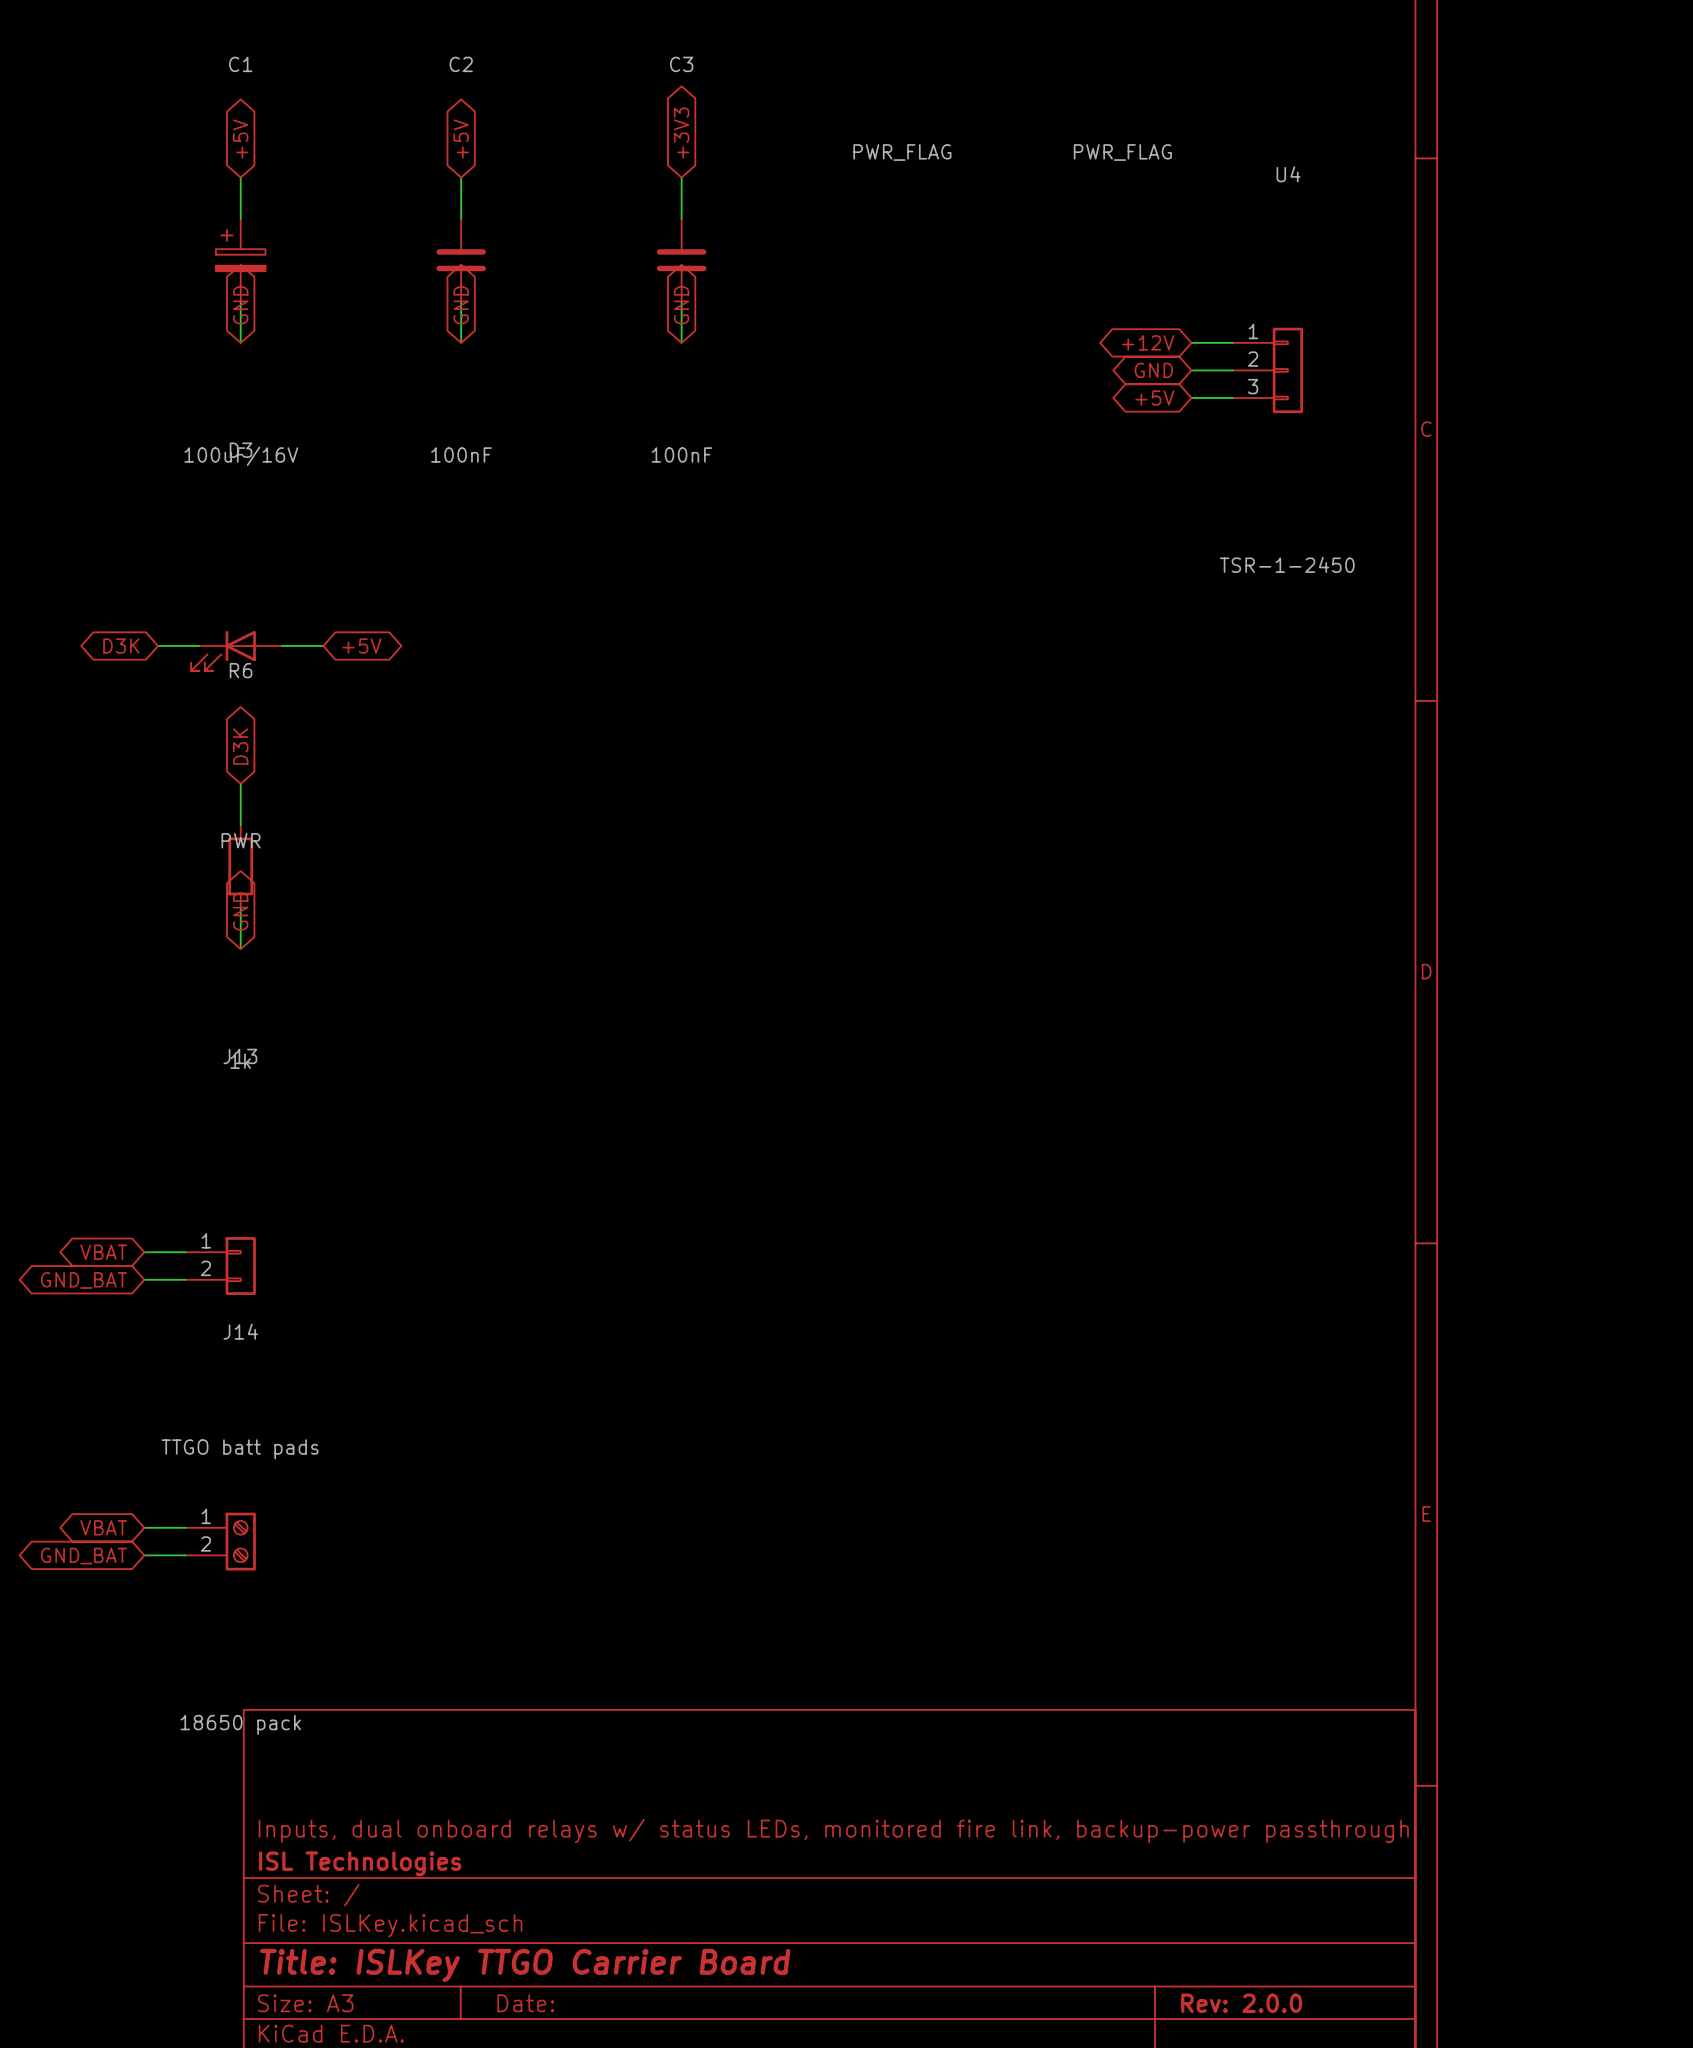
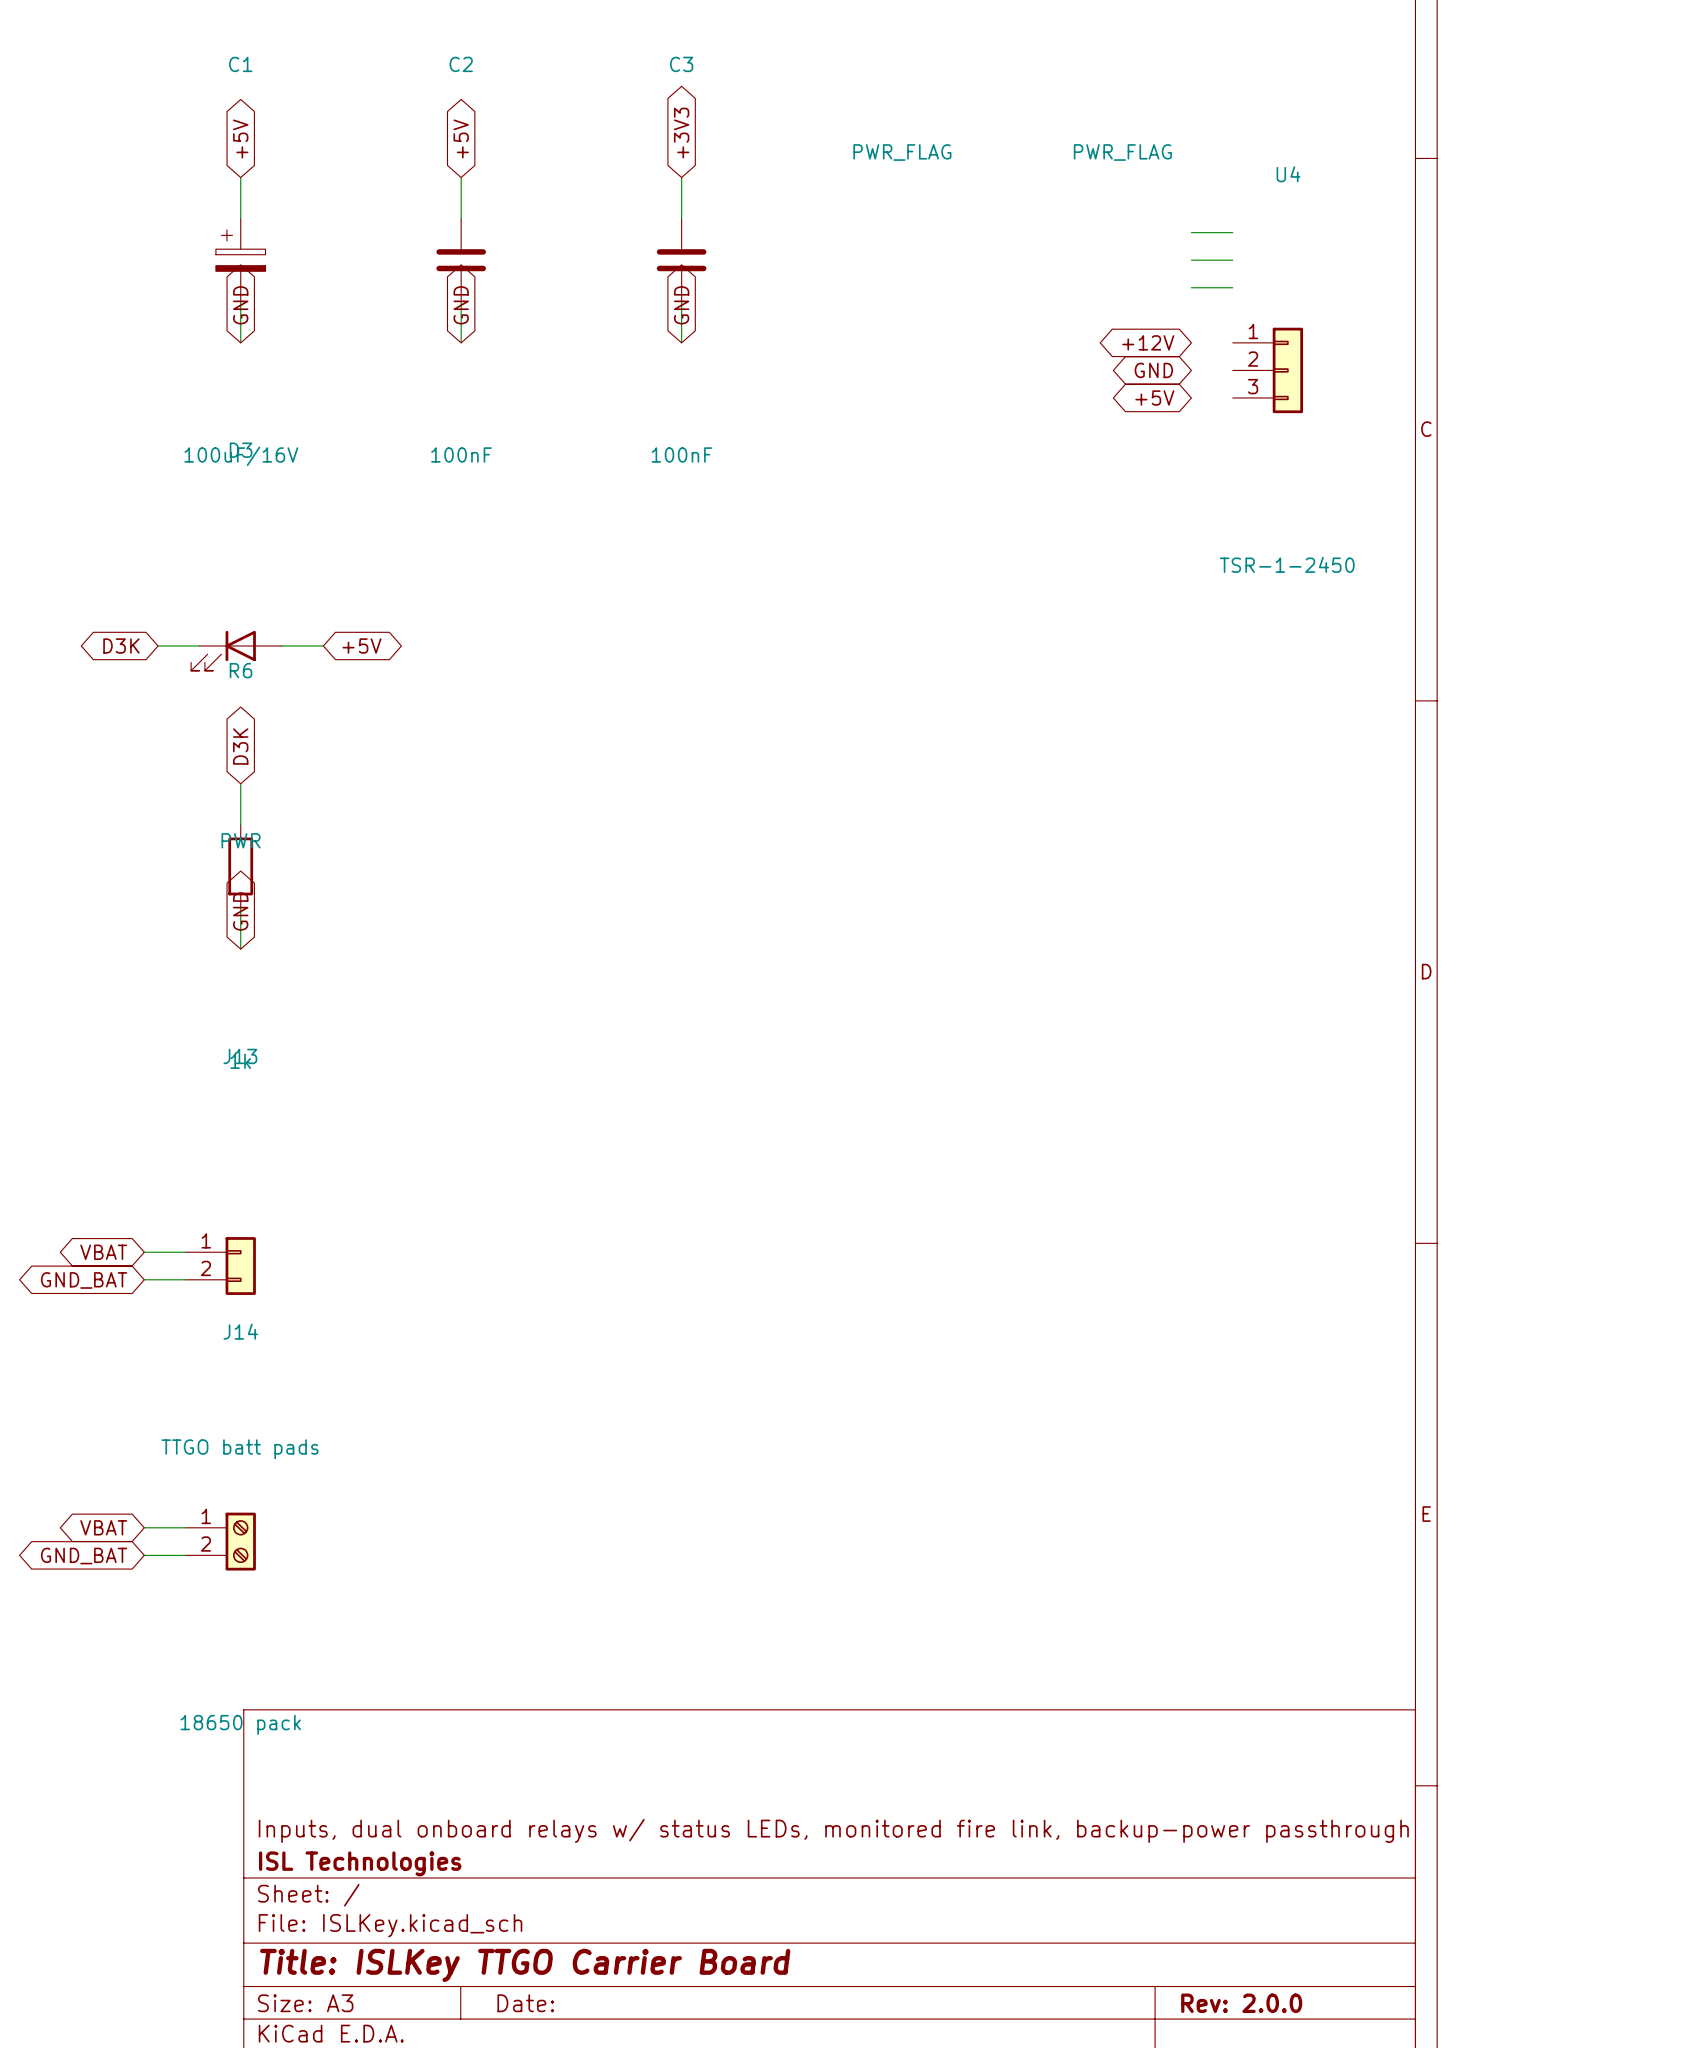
wire: (1191, 342) (1232, 342) -> (1191, 232) (1232, 232)
wire: (1191, 370) (1232, 370) -> (1191, 260) (1232, 260)
wire: (1191, 397) (1232, 397) -> (1191, 287) (1232, 287)

